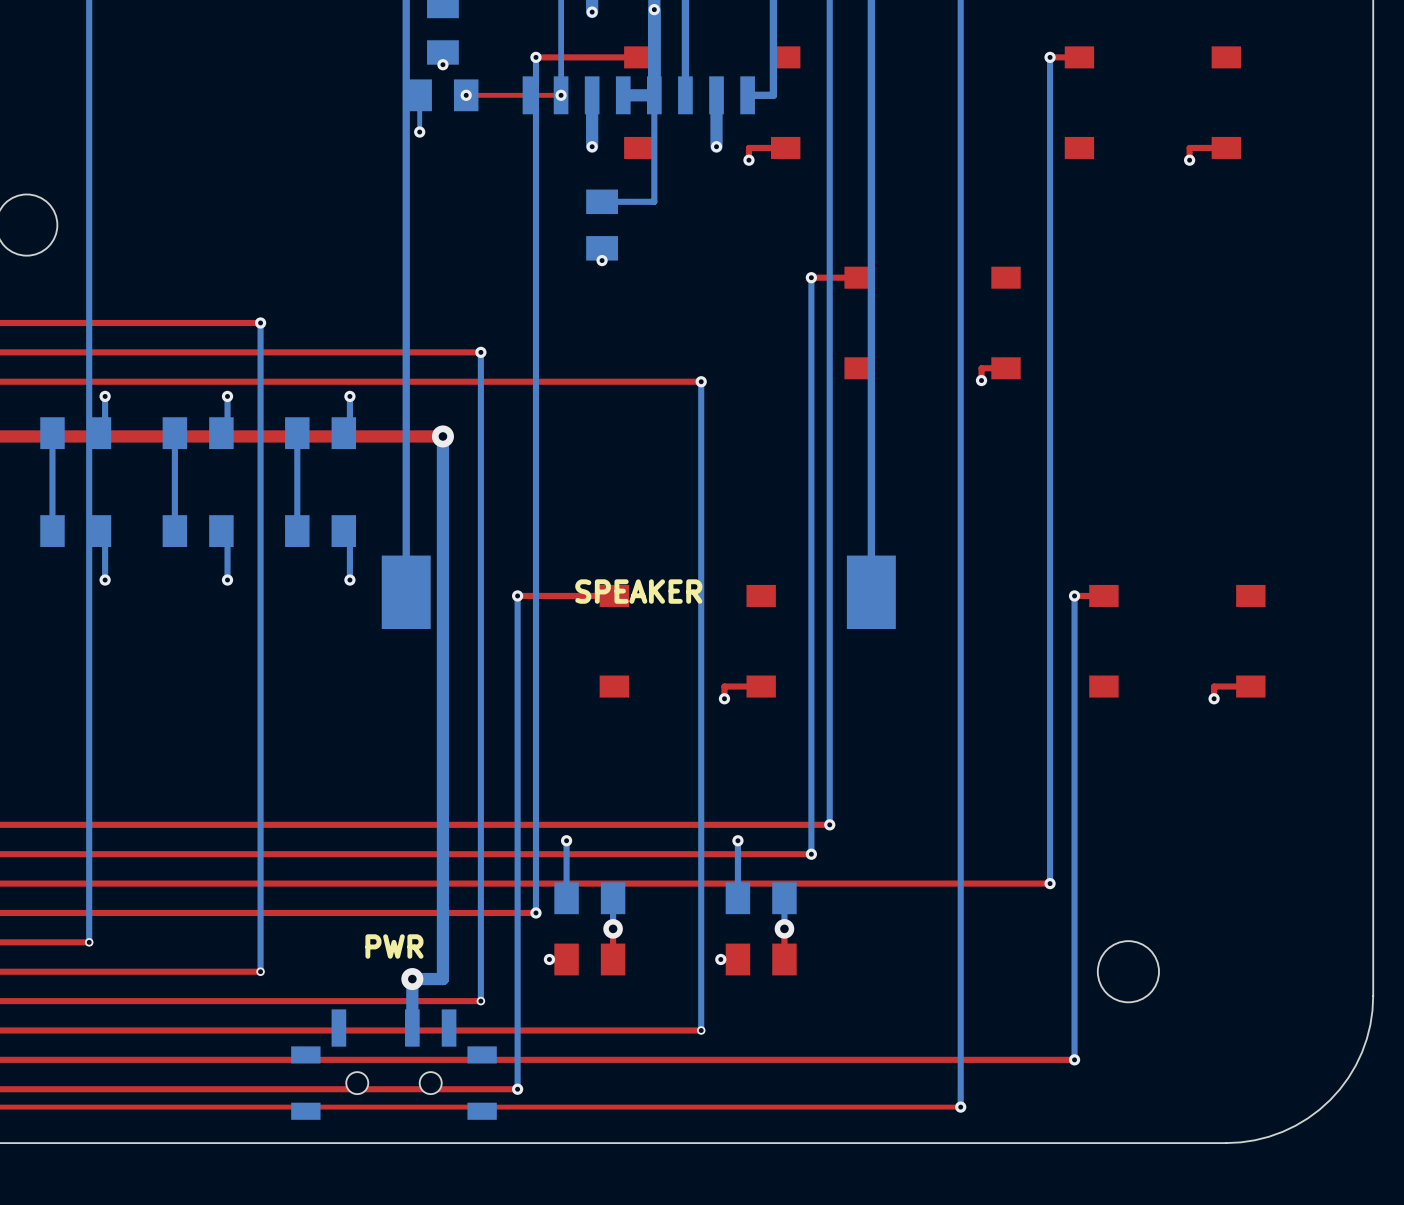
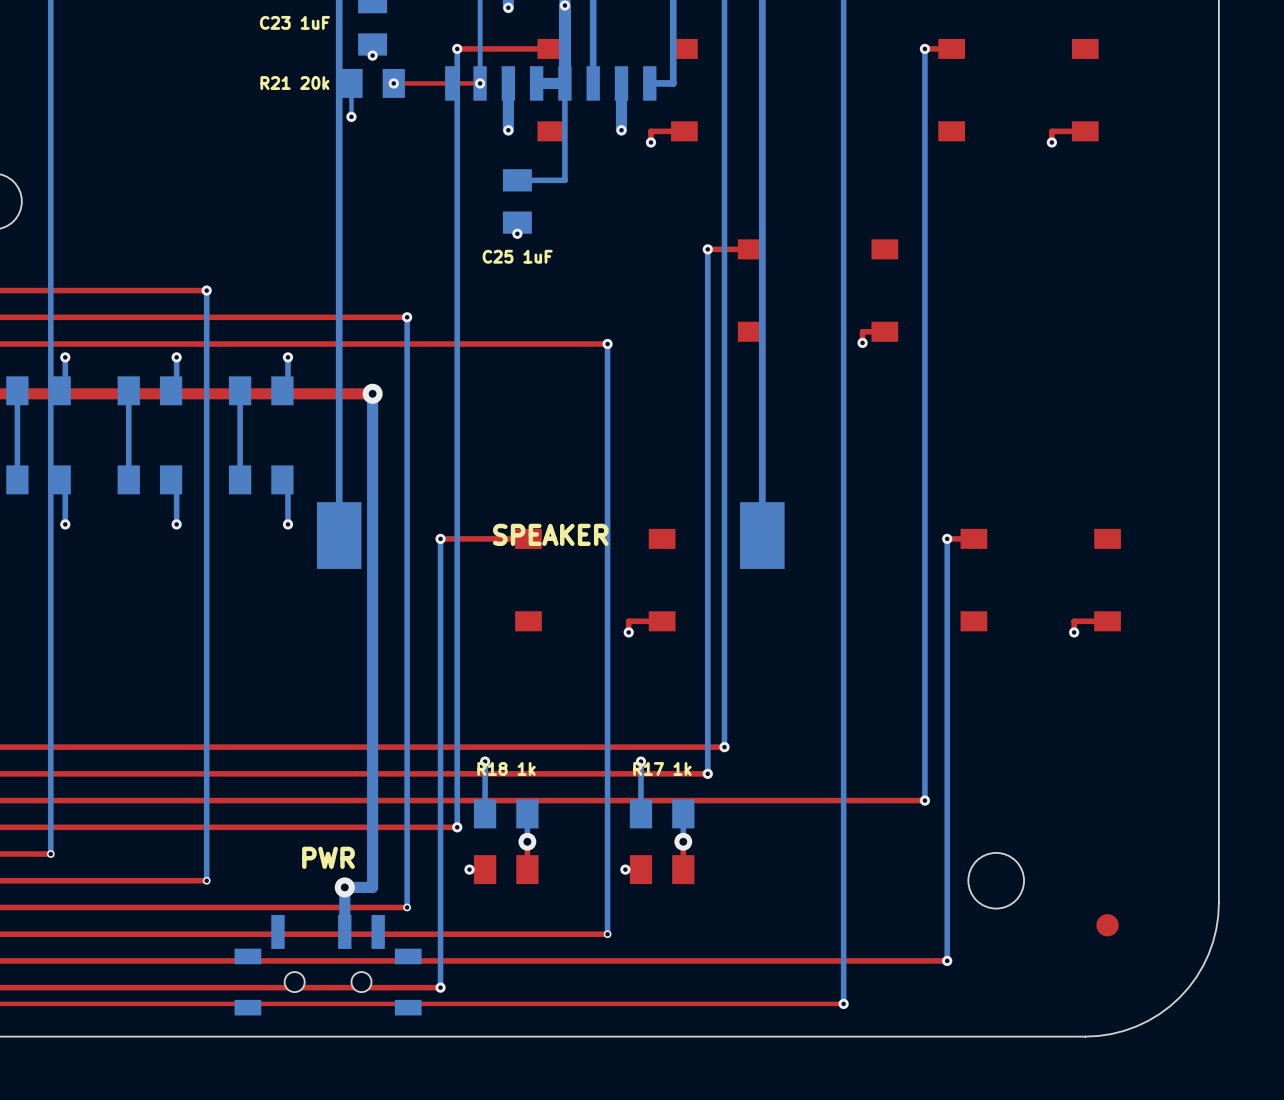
text: none -> C23 1uF (294, 22)
text: none -> R21 20k (294, 83)
text: none -> C25 1uF (517, 256)
text: none -> R18 1k (506, 768)
text: none -> R17 1k (662, 768)
part: none -> (1107, 925)

